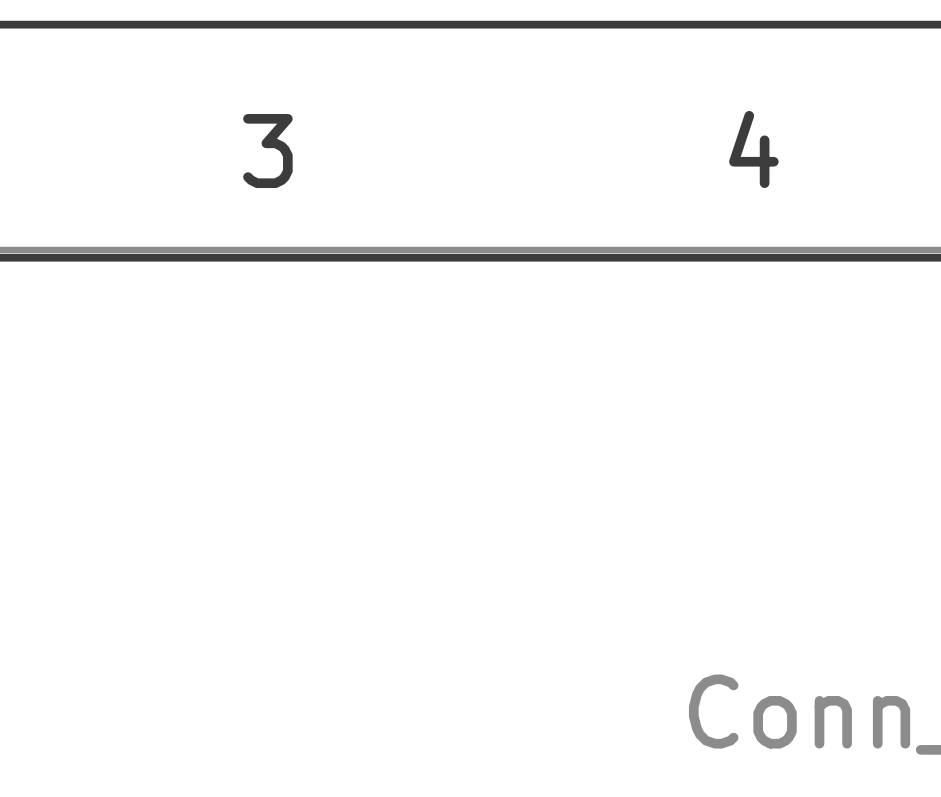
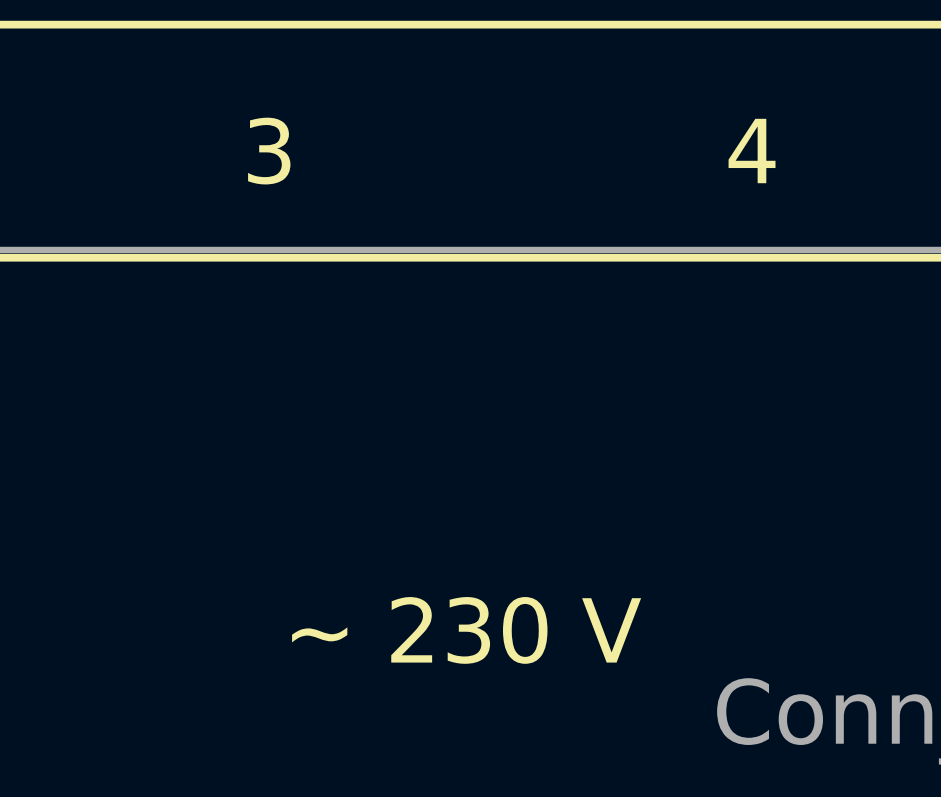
text: none -> ~ 230 V (466, 630)

